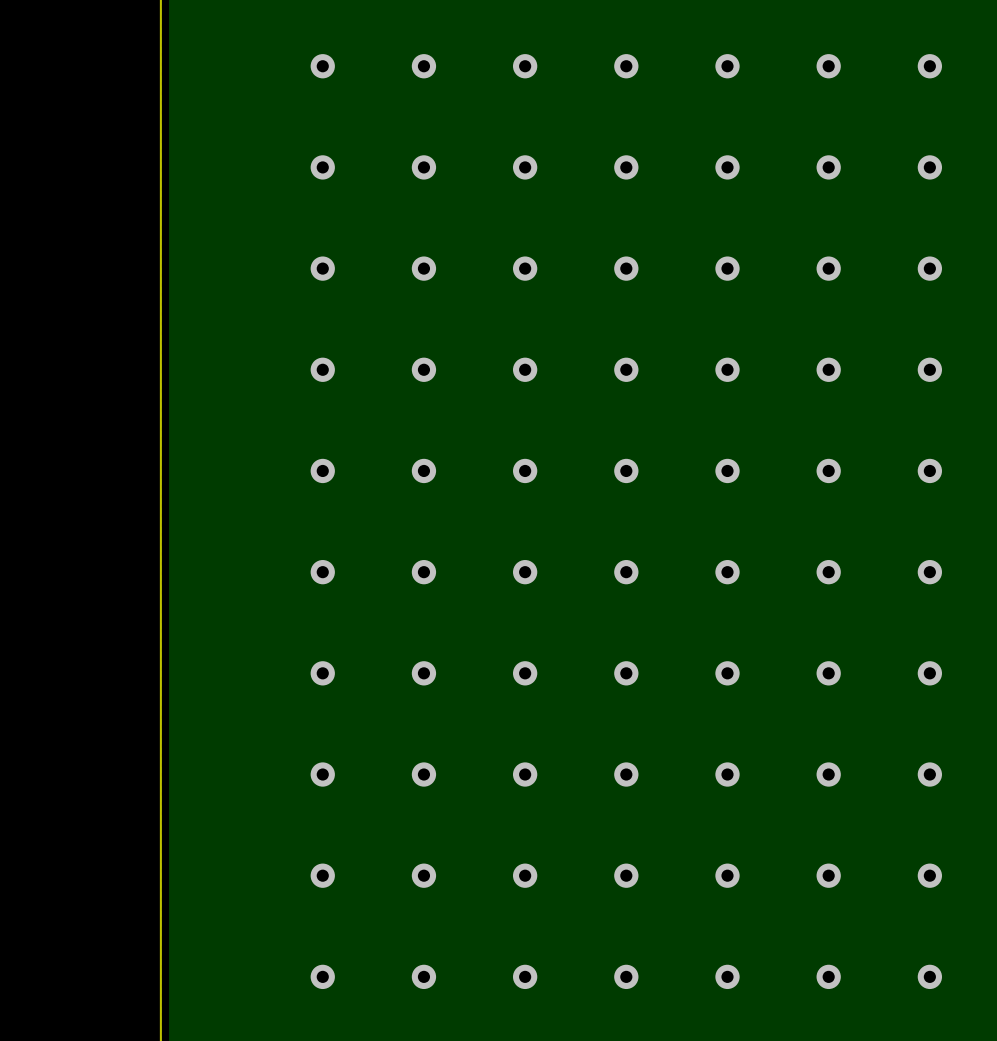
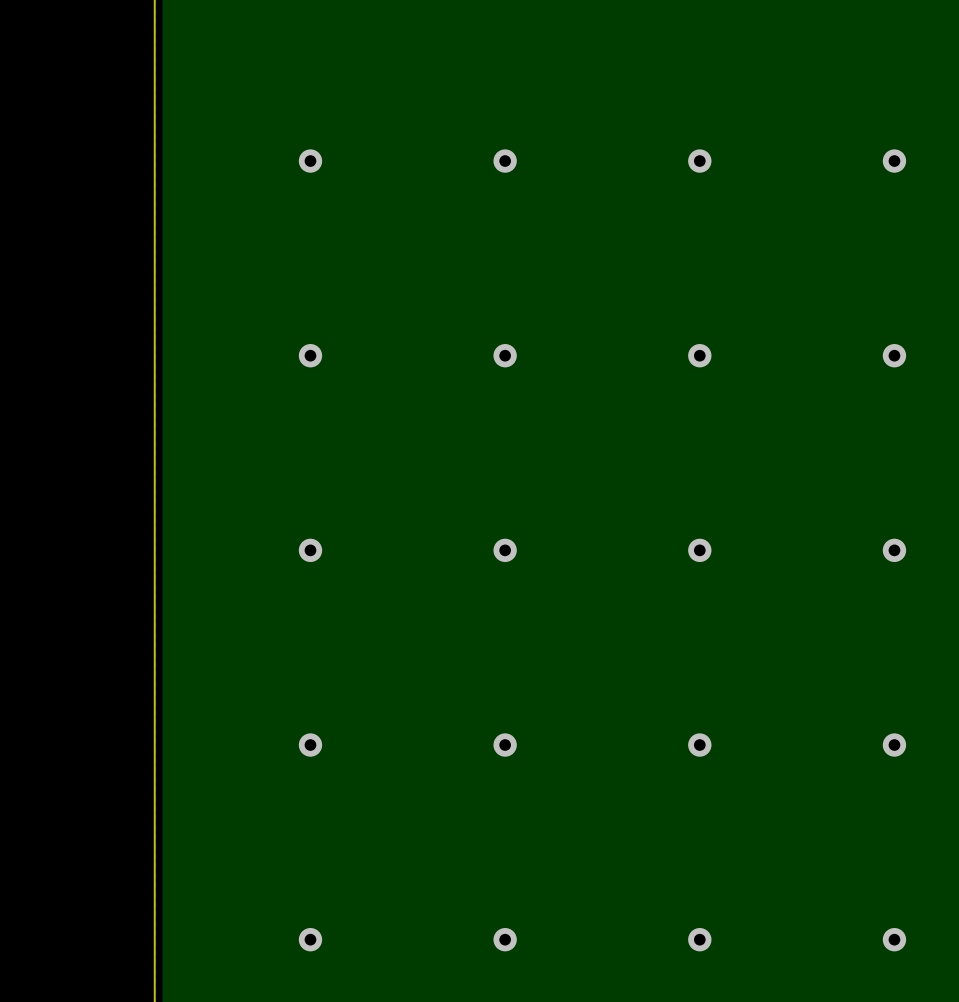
via: (322, 66) -> none
via: (423, 66) -> none
via: (525, 66) -> none
via: (626, 66) -> none
via: (727, 66) -> none
via: (828, 66) -> none
via: (929, 66) -> none
via: (423, 167) -> none
via: (626, 167) -> none
via: (828, 167) -> none
via: (322, 268) -> none
via: (423, 268) -> none
via: (525, 268) -> none
via: (626, 268) -> none
via: (727, 268) -> none
via: (828, 268) -> none
via: (929, 268) -> none
via: (423, 369) -> none
via: (626, 369) -> none
via: (828, 369) -> none
via: (322, 470) -> none
via: (423, 470) -> none
via: (525, 470) -> none
via: (626, 470) -> none
via: (727, 470) -> none
via: (828, 470) -> none
via: (929, 470) -> none
via: (423, 572) -> none
via: (626, 572) -> none
via: (828, 572) -> none
via: (322, 673) -> none
via: (423, 673) -> none
via: (525, 673) -> none
via: (626, 673) -> none
via: (727, 673) -> none
via: (828, 673) -> none
via: (929, 673) -> none
via: (423, 774) -> none
via: (626, 774) -> none
via: (828, 774) -> none
via: (322, 875) -> none
via: (423, 875) -> none
via: (525, 875) -> none
via: (626, 875) -> none
via: (727, 875) -> none
via: (828, 875) -> none
via: (929, 875) -> none
via: (423, 976) -> none
via: (626, 976) -> none
via: (828, 976) -> none

